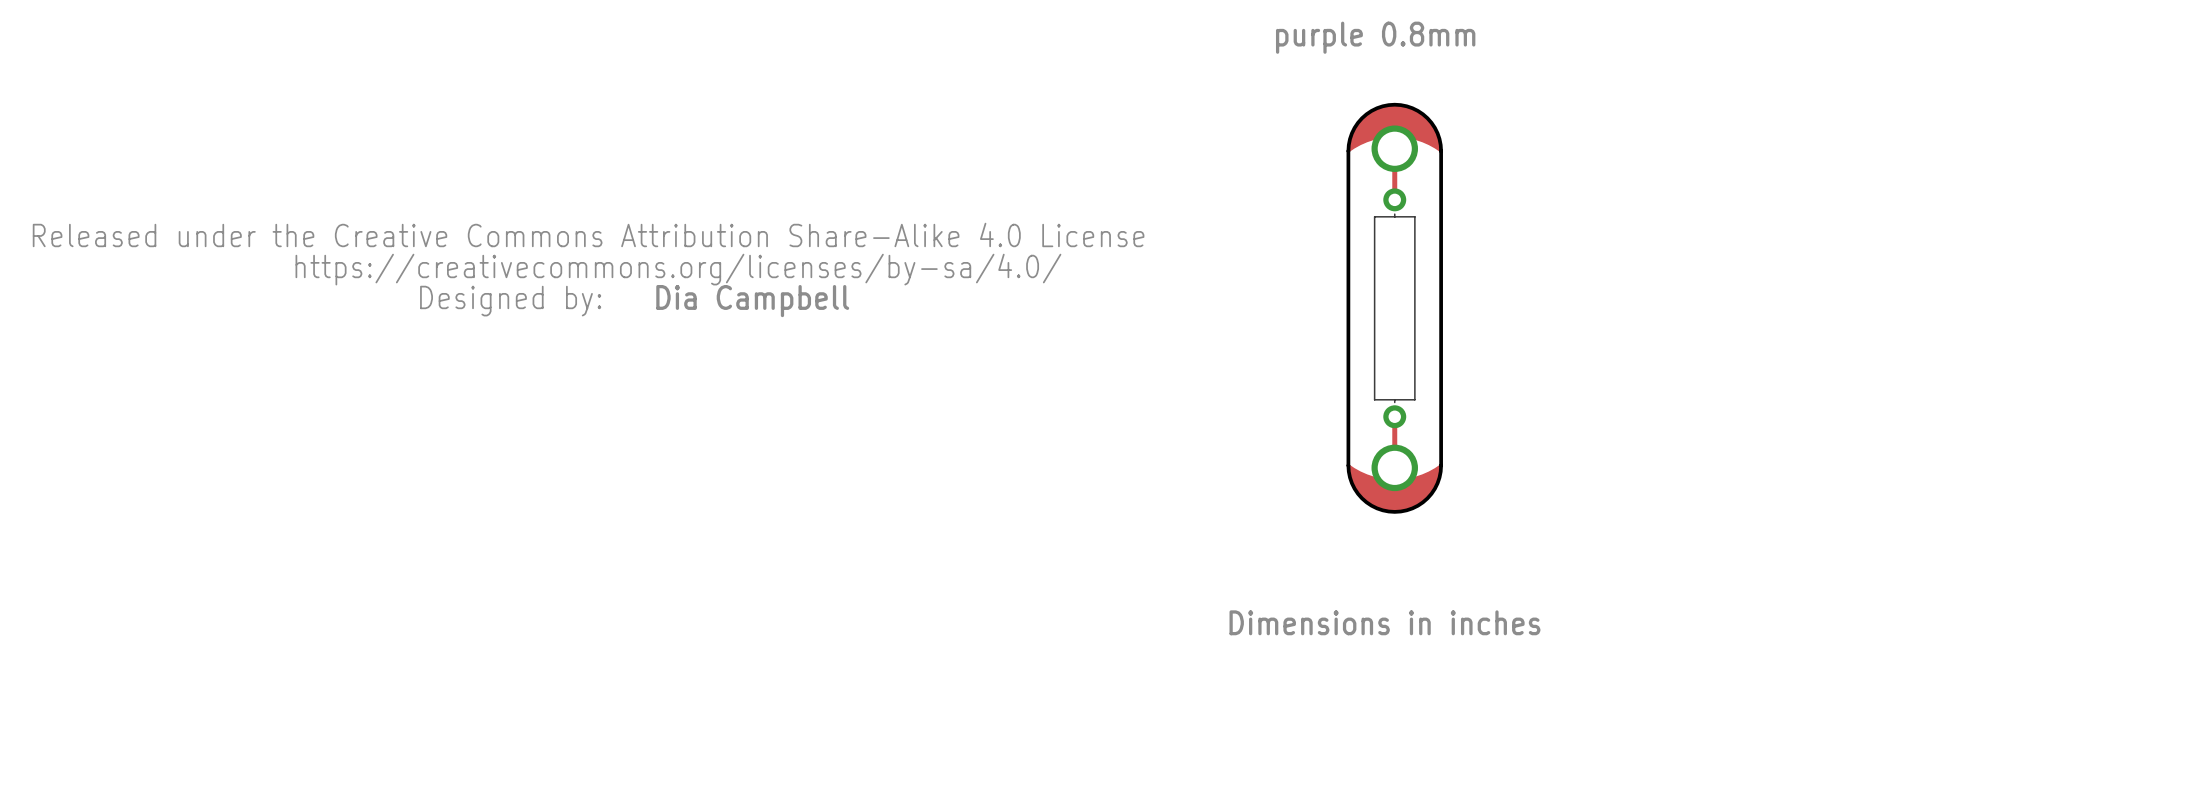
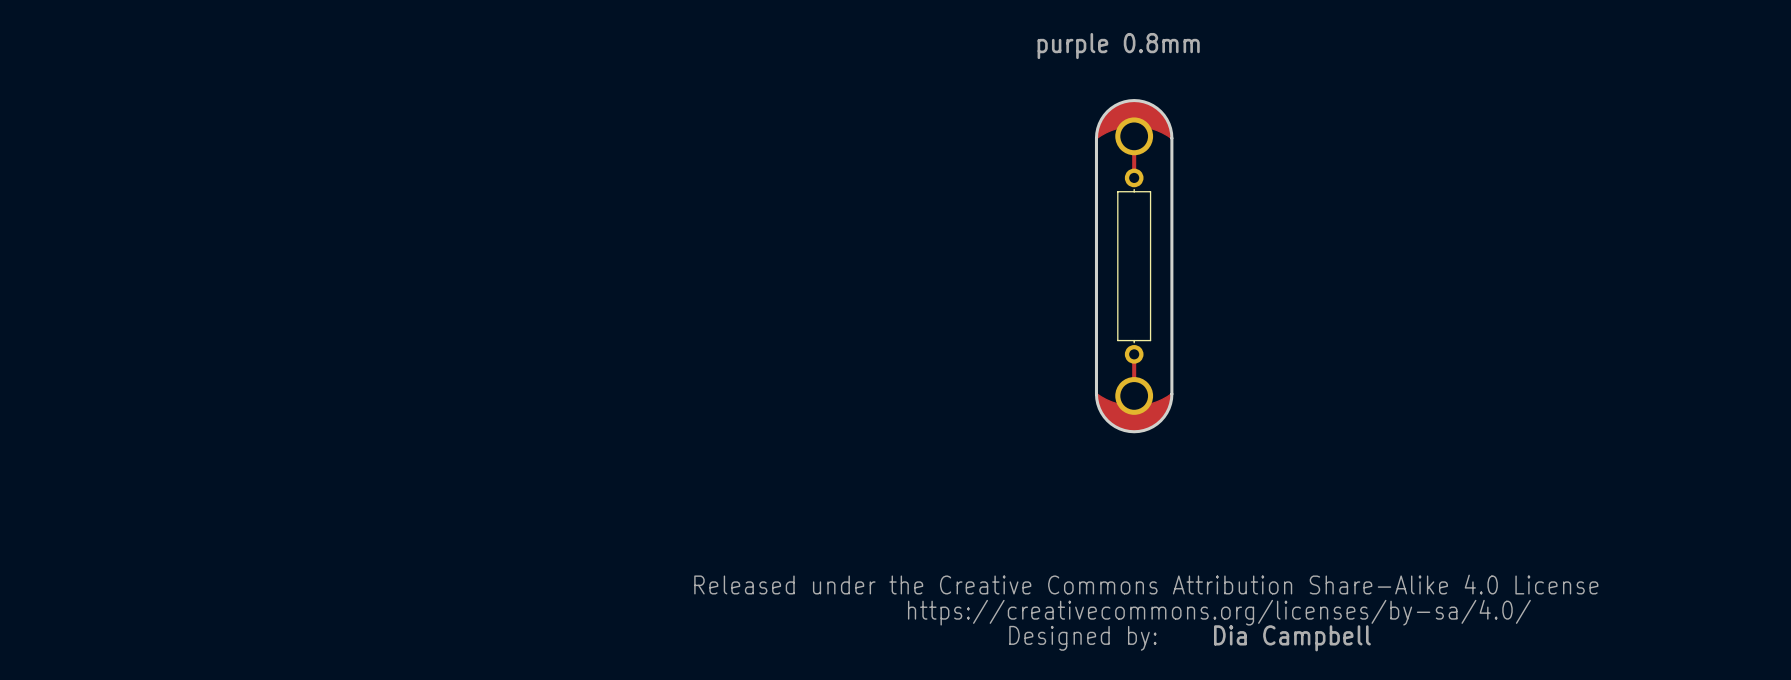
drawing: [32, 222, 1145, 317] -> none
text: Dia Campbell (752, 301) -> none
text: Dimensions in inches (1384, 622) -> none
drawing: none -> [694, 574, 1599, 651]
text: none -> Dia Campbell (1292, 638)

